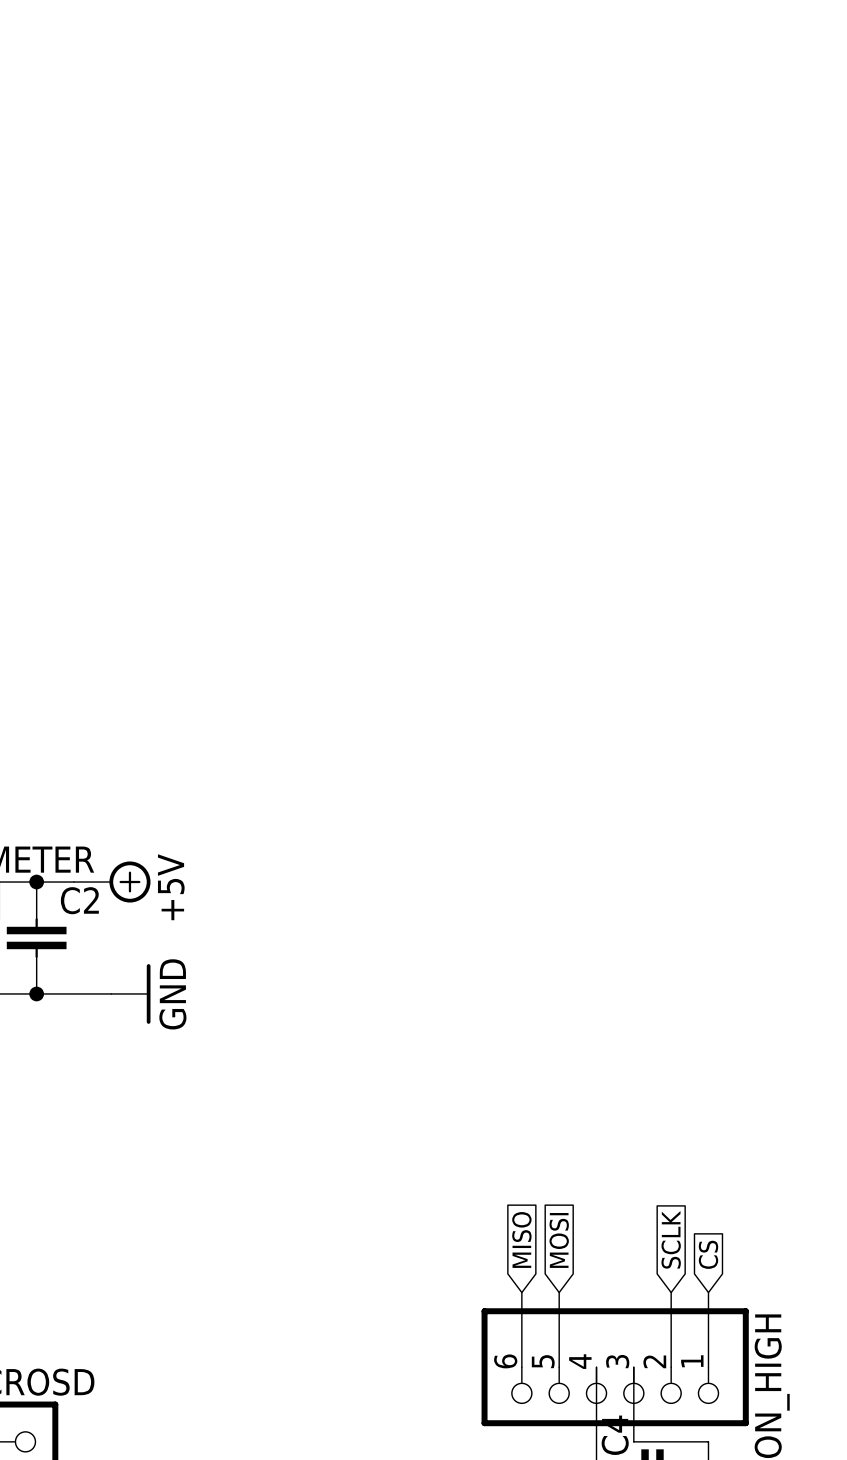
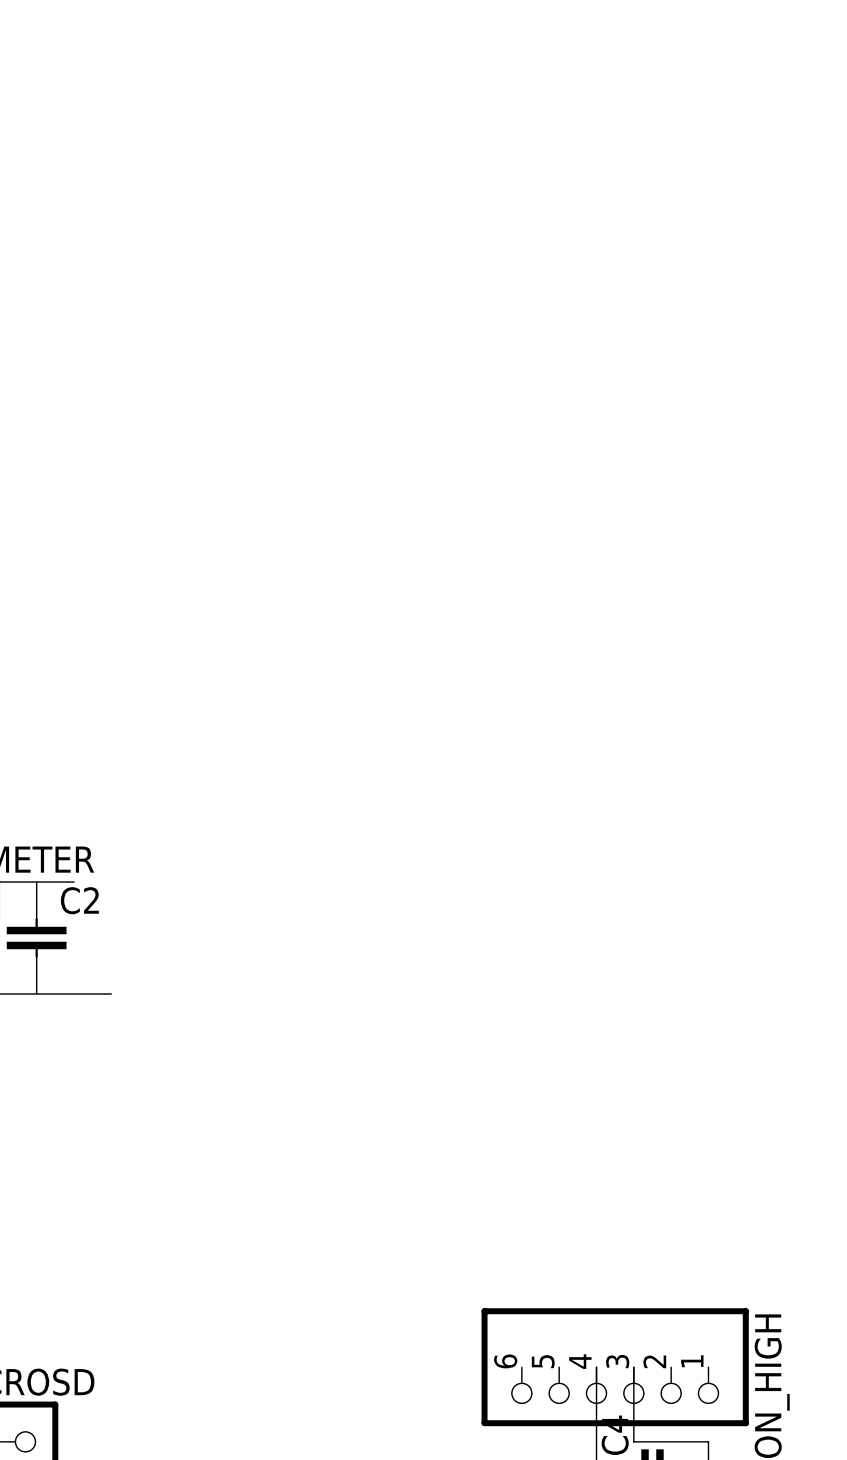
junction: (36, 882) -> none
power symbol: +5V (112, 882) -> none
junction: (36, 993) -> none
power symbol: GND (130, 993) -> none
global label: MISO (521, 1239) -> none
global label: SCLK (671, 1239) -> none
global label: MOSI (559, 1240) -> none
global label: CS (708, 1254) -> none
wire: (521, 1292) (521, 1367) -> none
wire: (559, 1292) (559, 1367) -> none
wire: (671, 1292) (671, 1367) -> none
wire: (708, 1292) (708, 1367) -> none

